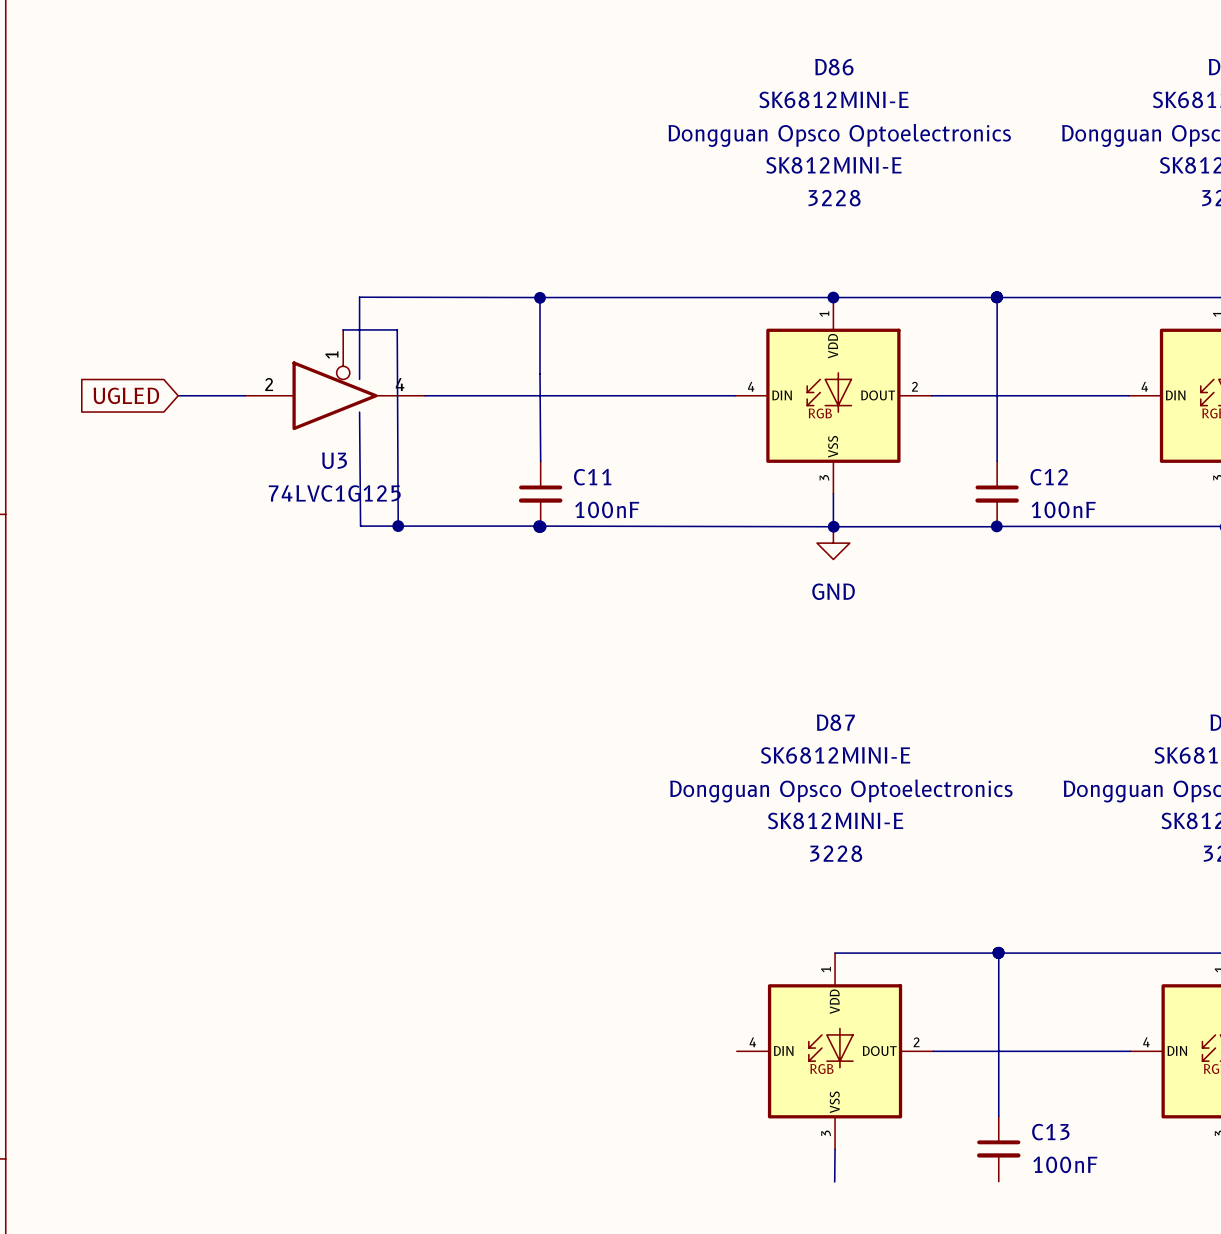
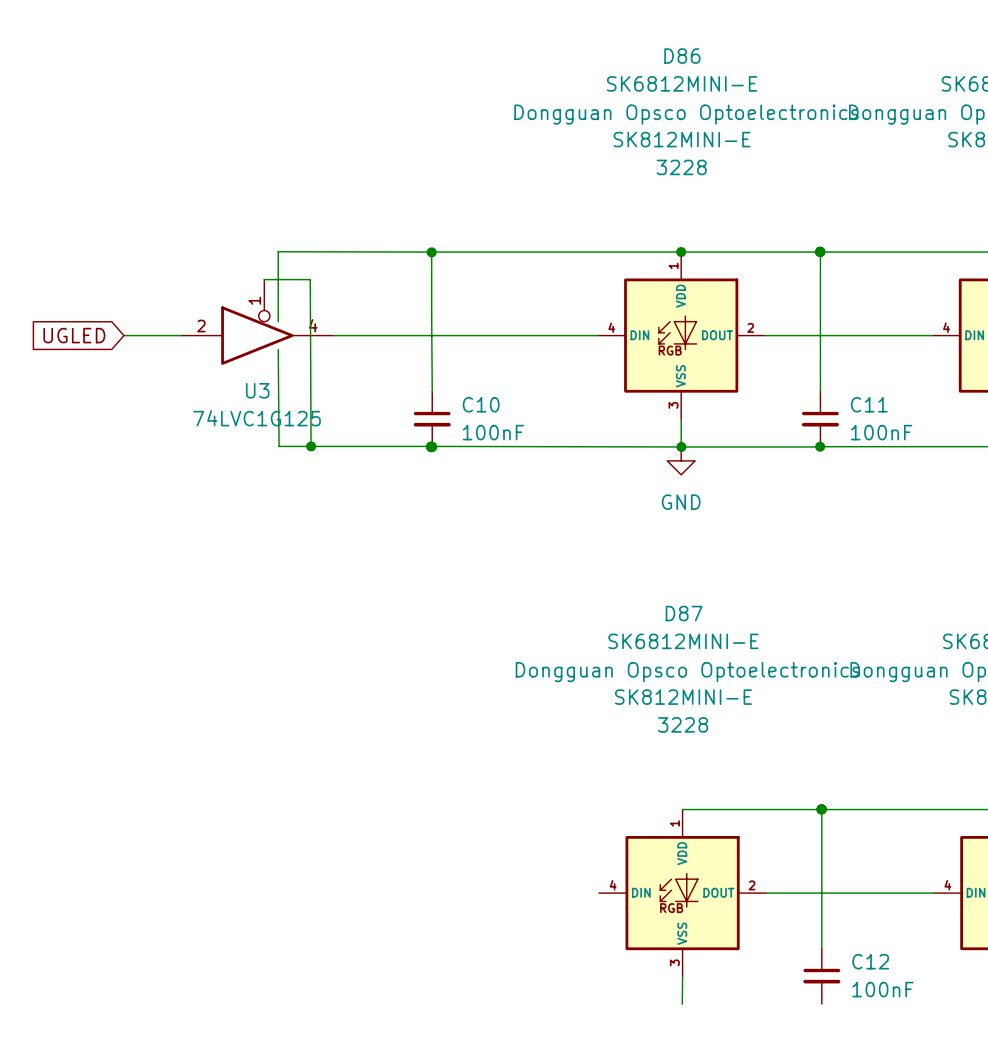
C11 name: C11 (592, 477) -> C10 (481, 404)
C12 name: C12 (1049, 477) -> C11 (869, 404)
C13 name: C13 (1050, 1132) -> C12 (870, 961)

